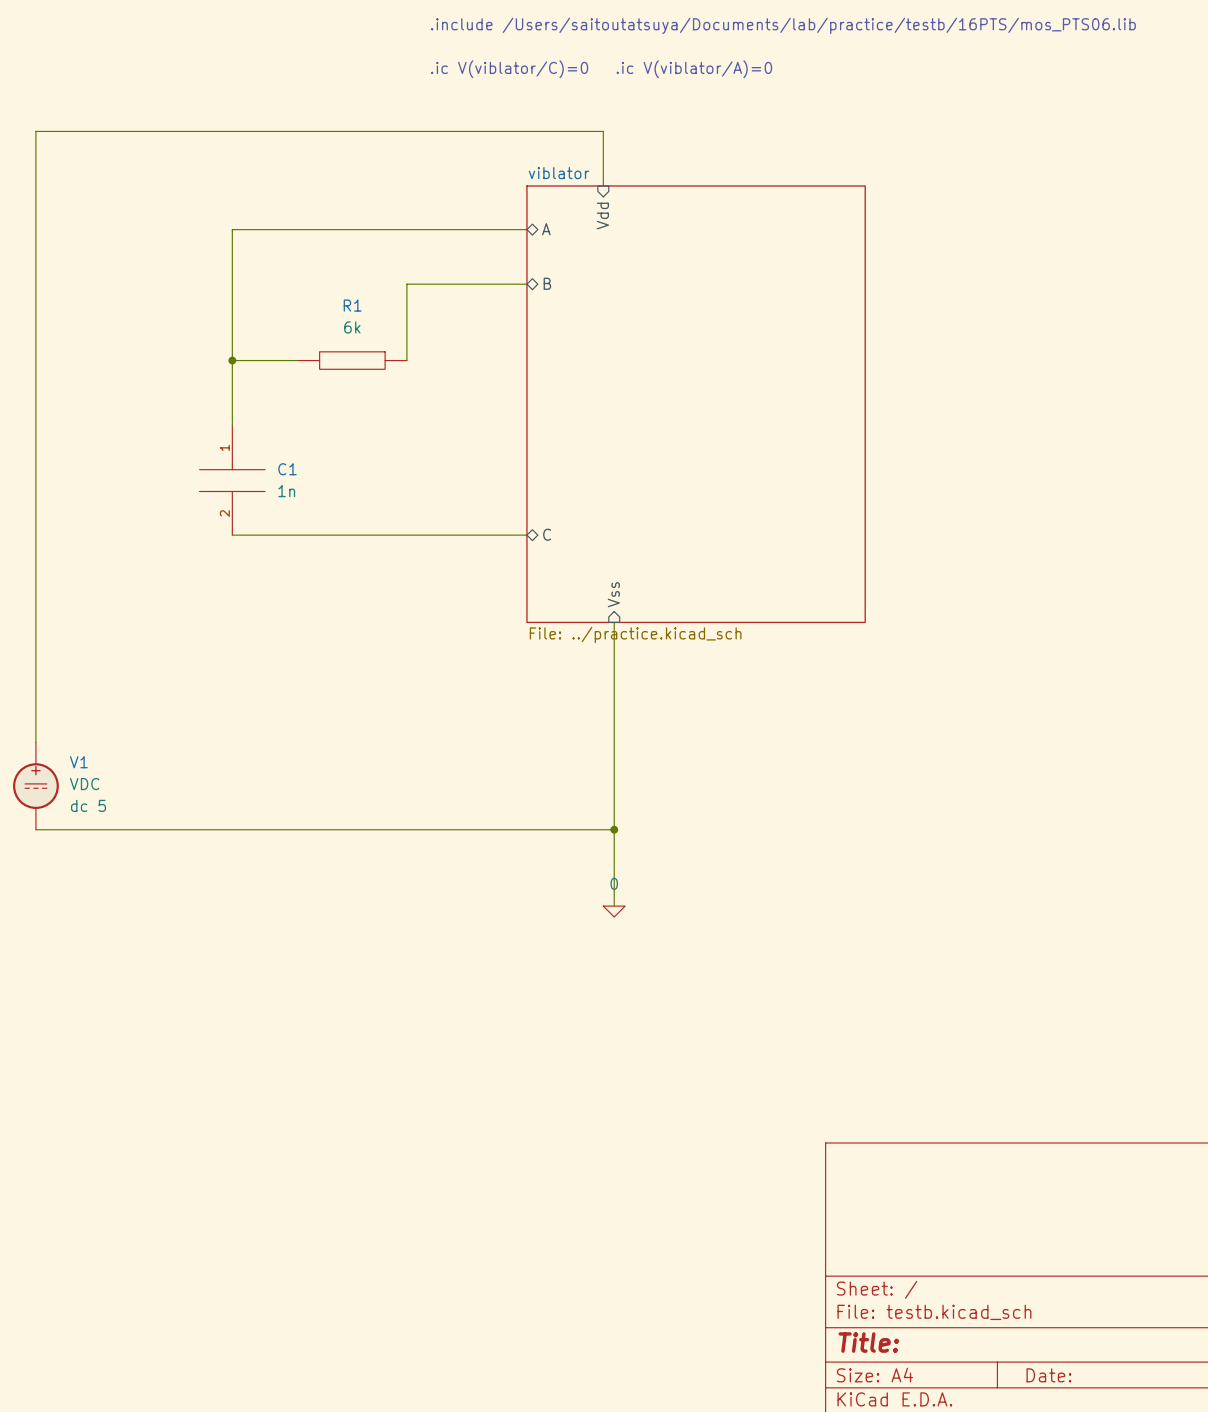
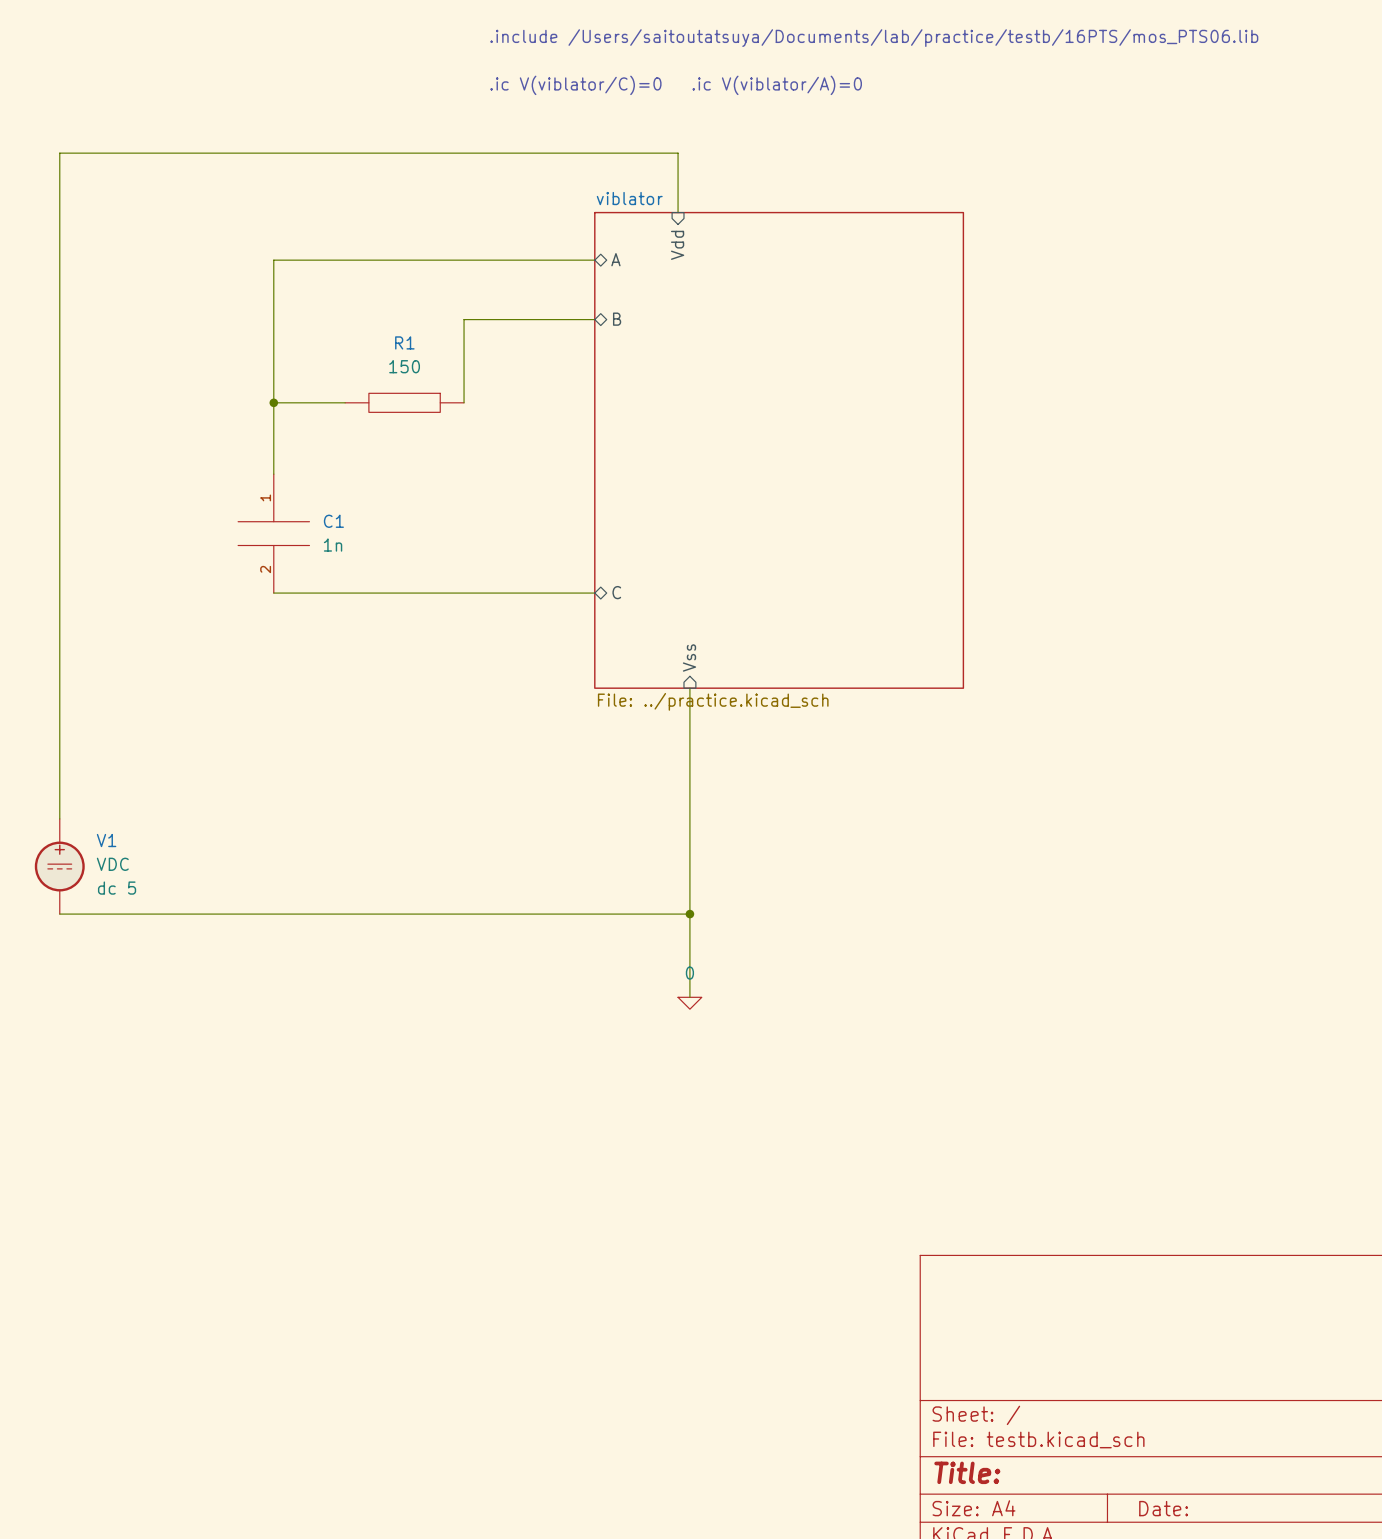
R1 value: 6k (352, 327) -> 150 (404, 366)

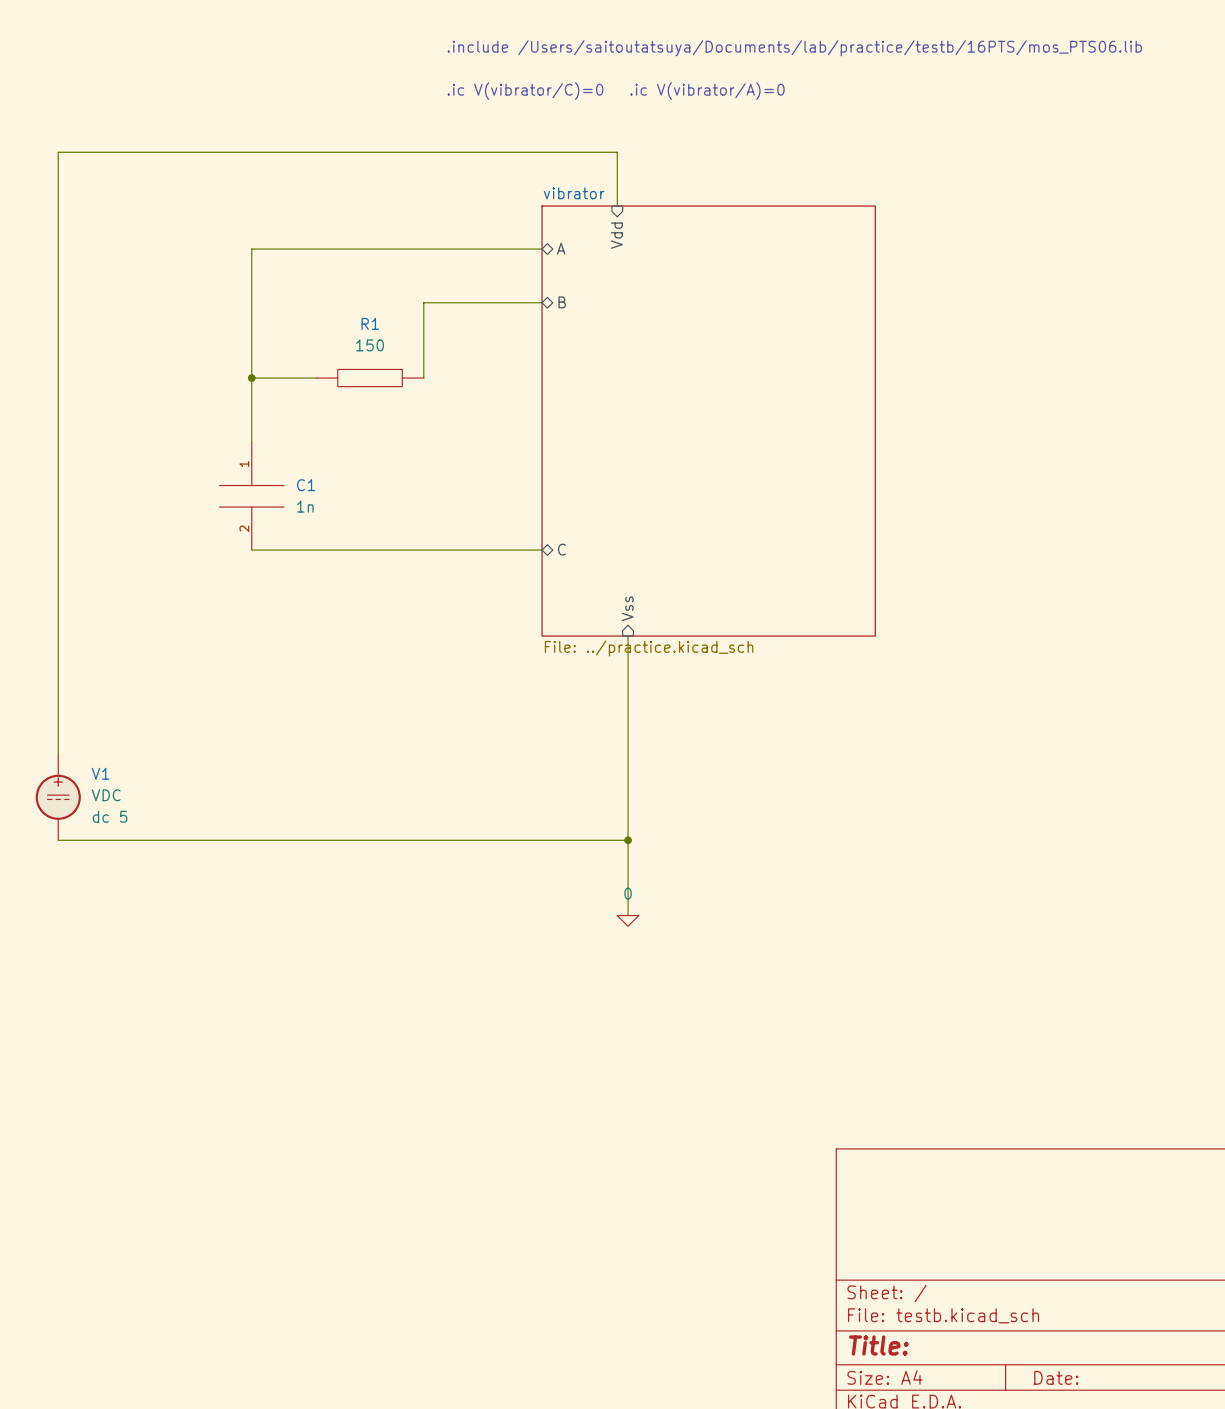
text: .ic V(viblator/C)=0 (575, 85) -> .ic V(vibrator/C)=0 (525, 90)
text: .ic V(viblator/A)=0 (777, 85) -> .ic V(vibrator/A)=0 (707, 90)
sheet viblator name: viblator (629, 198) -> vibrator (574, 193)

